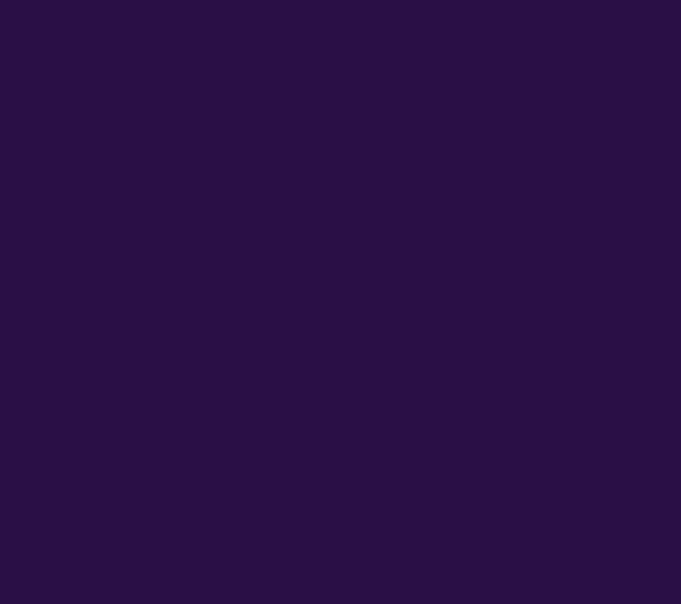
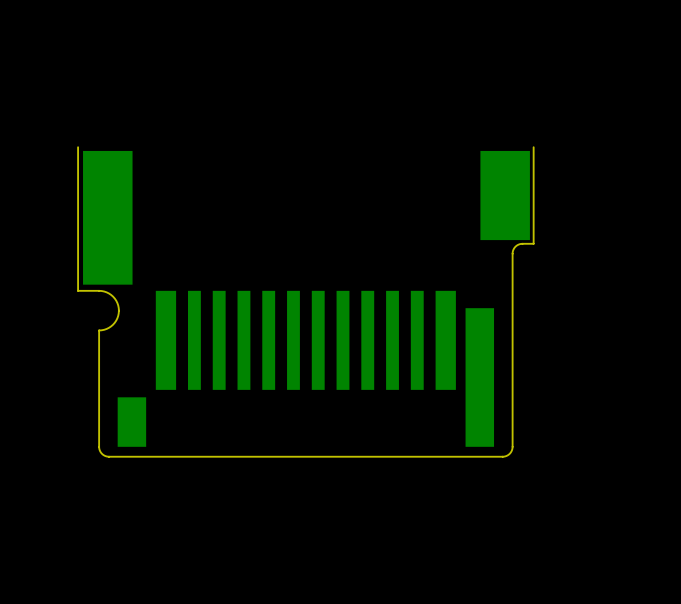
part: none -> (305, 301)

